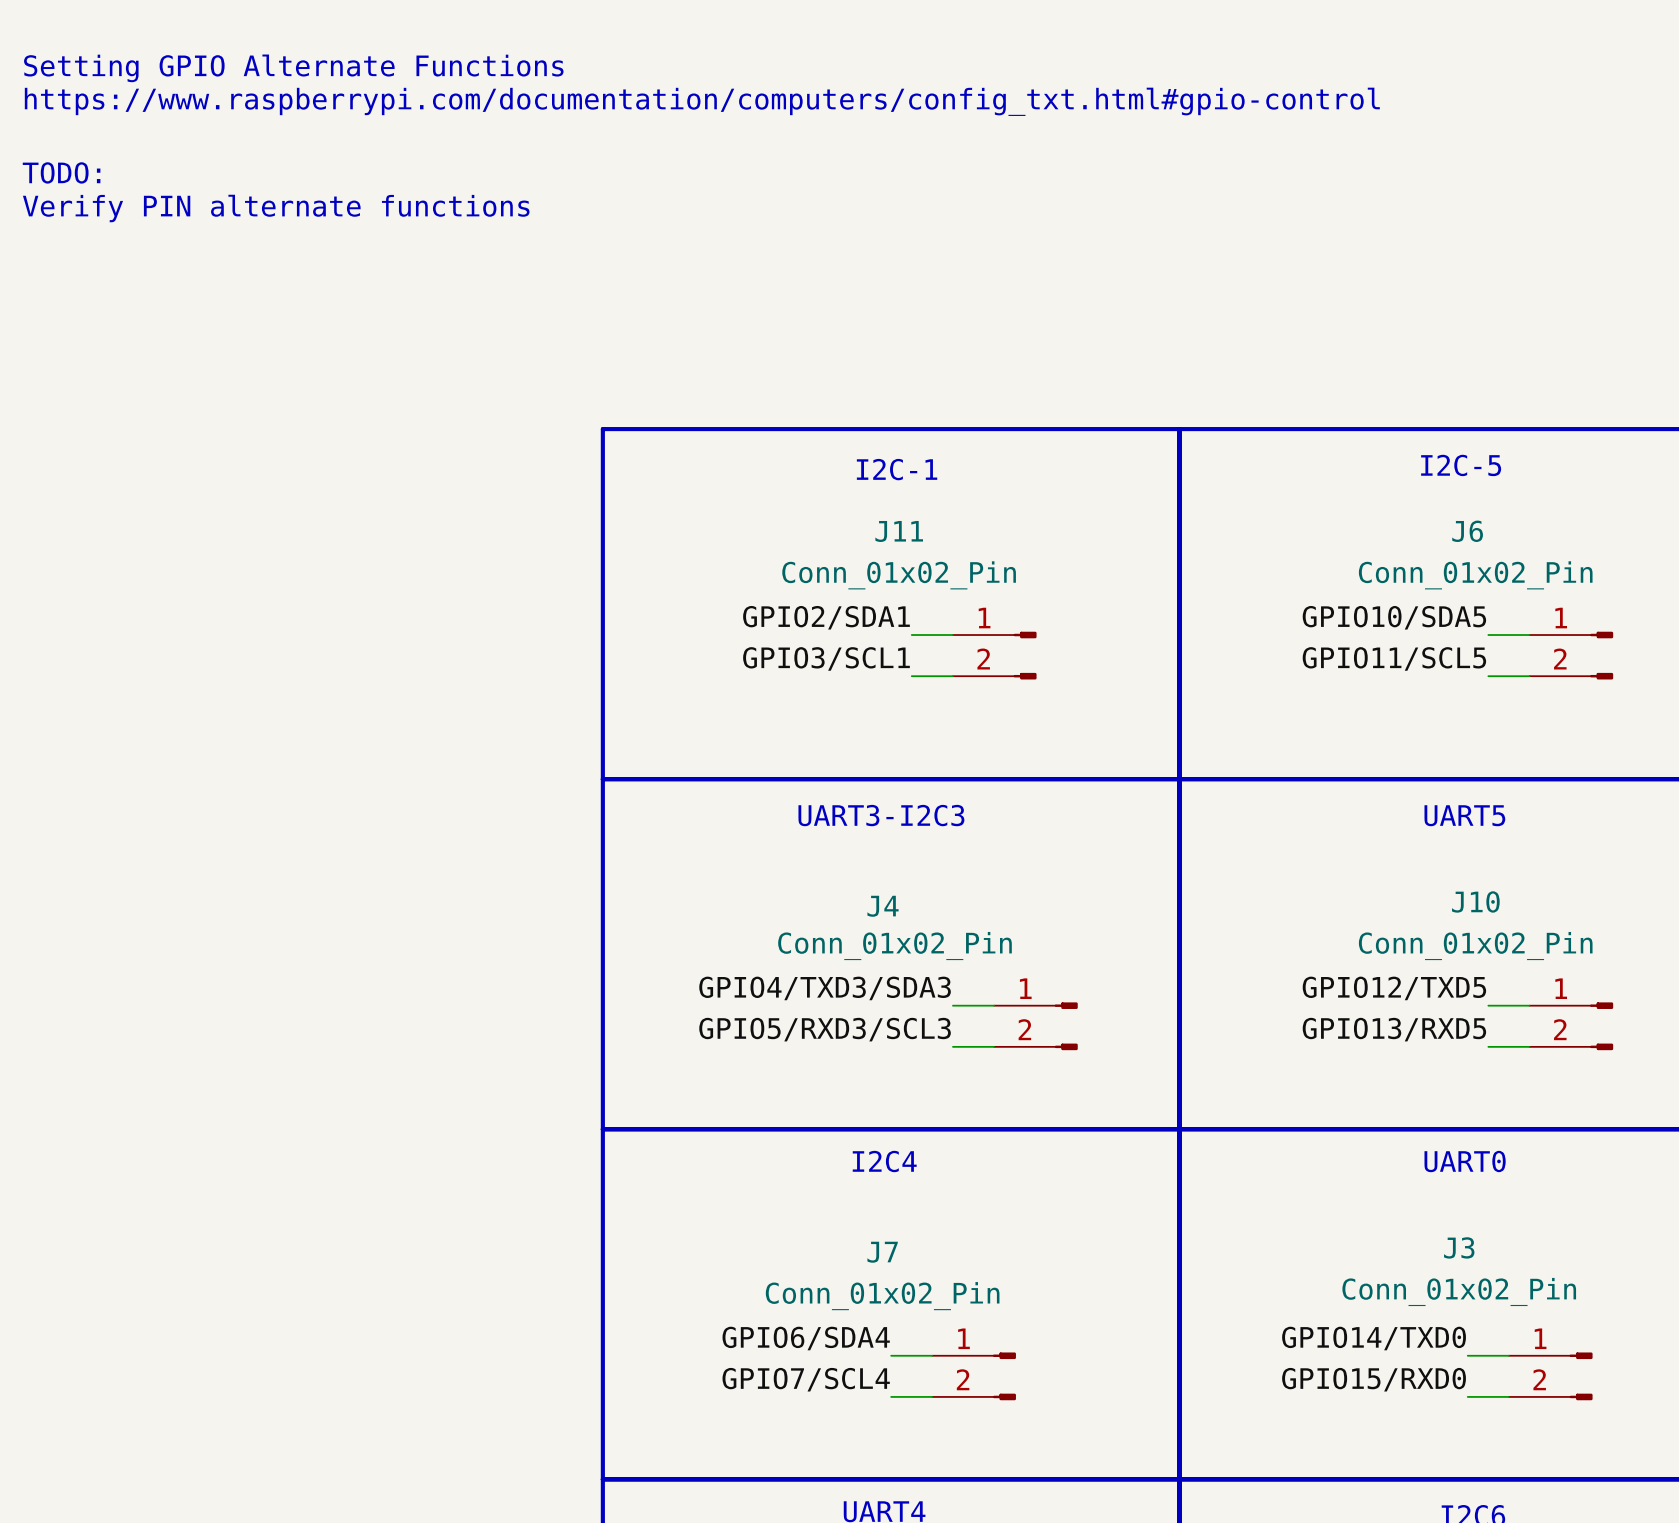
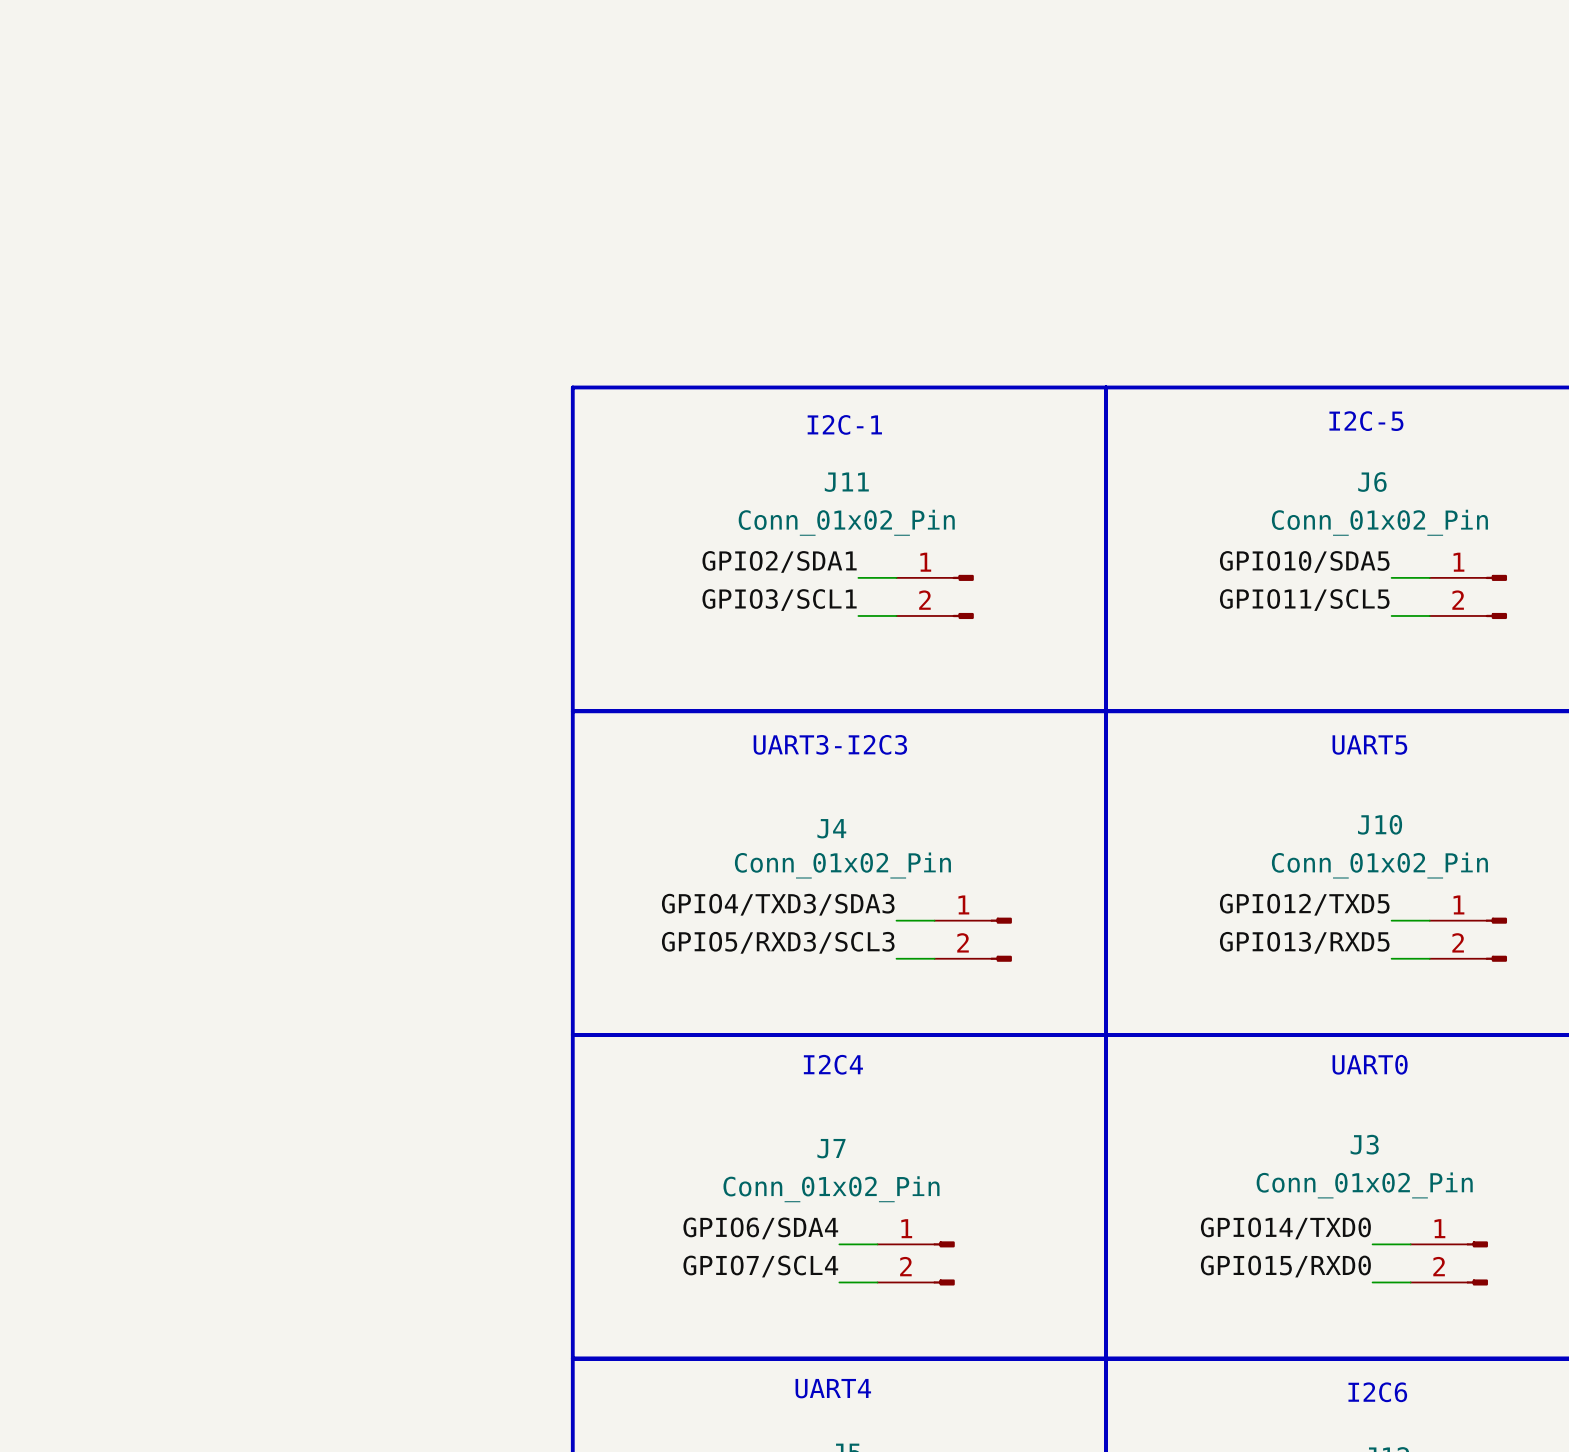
text: Setting GPIO Alternate Functions (293, 68) -> none
text: https://www.raspberrypi.com/documentation/computers/config_txt.html#gpio-control (702, 101) -> none
text: TODO: (61, 172) -> none
text: Verify PIN alternate functions (276, 208) -> none

